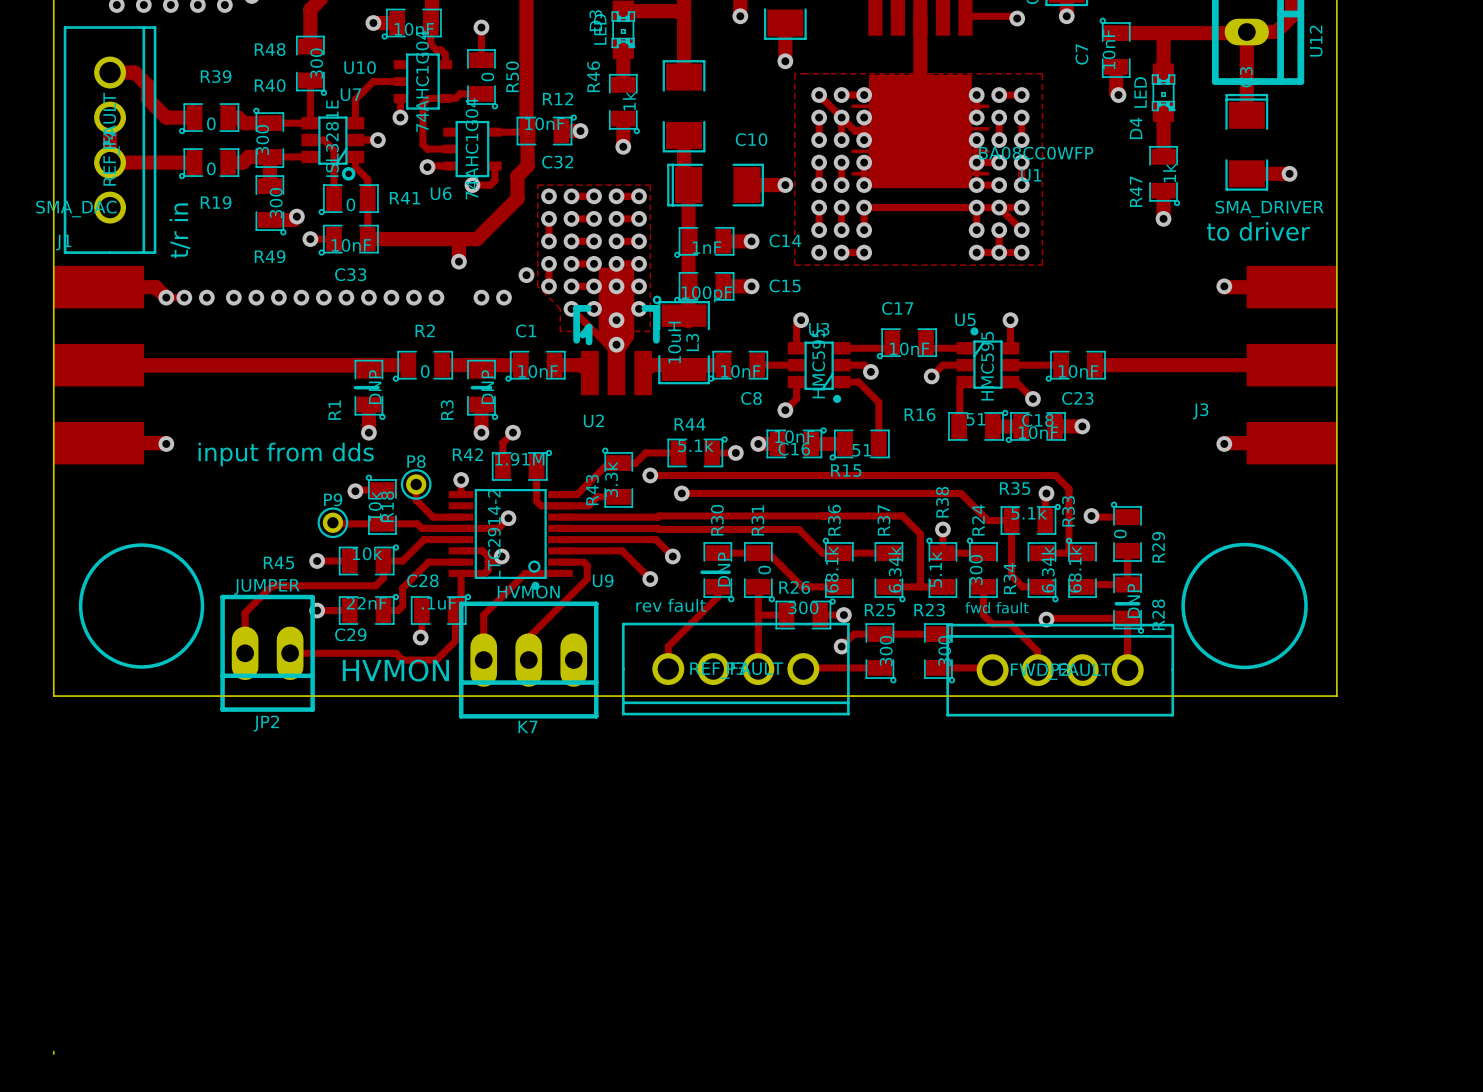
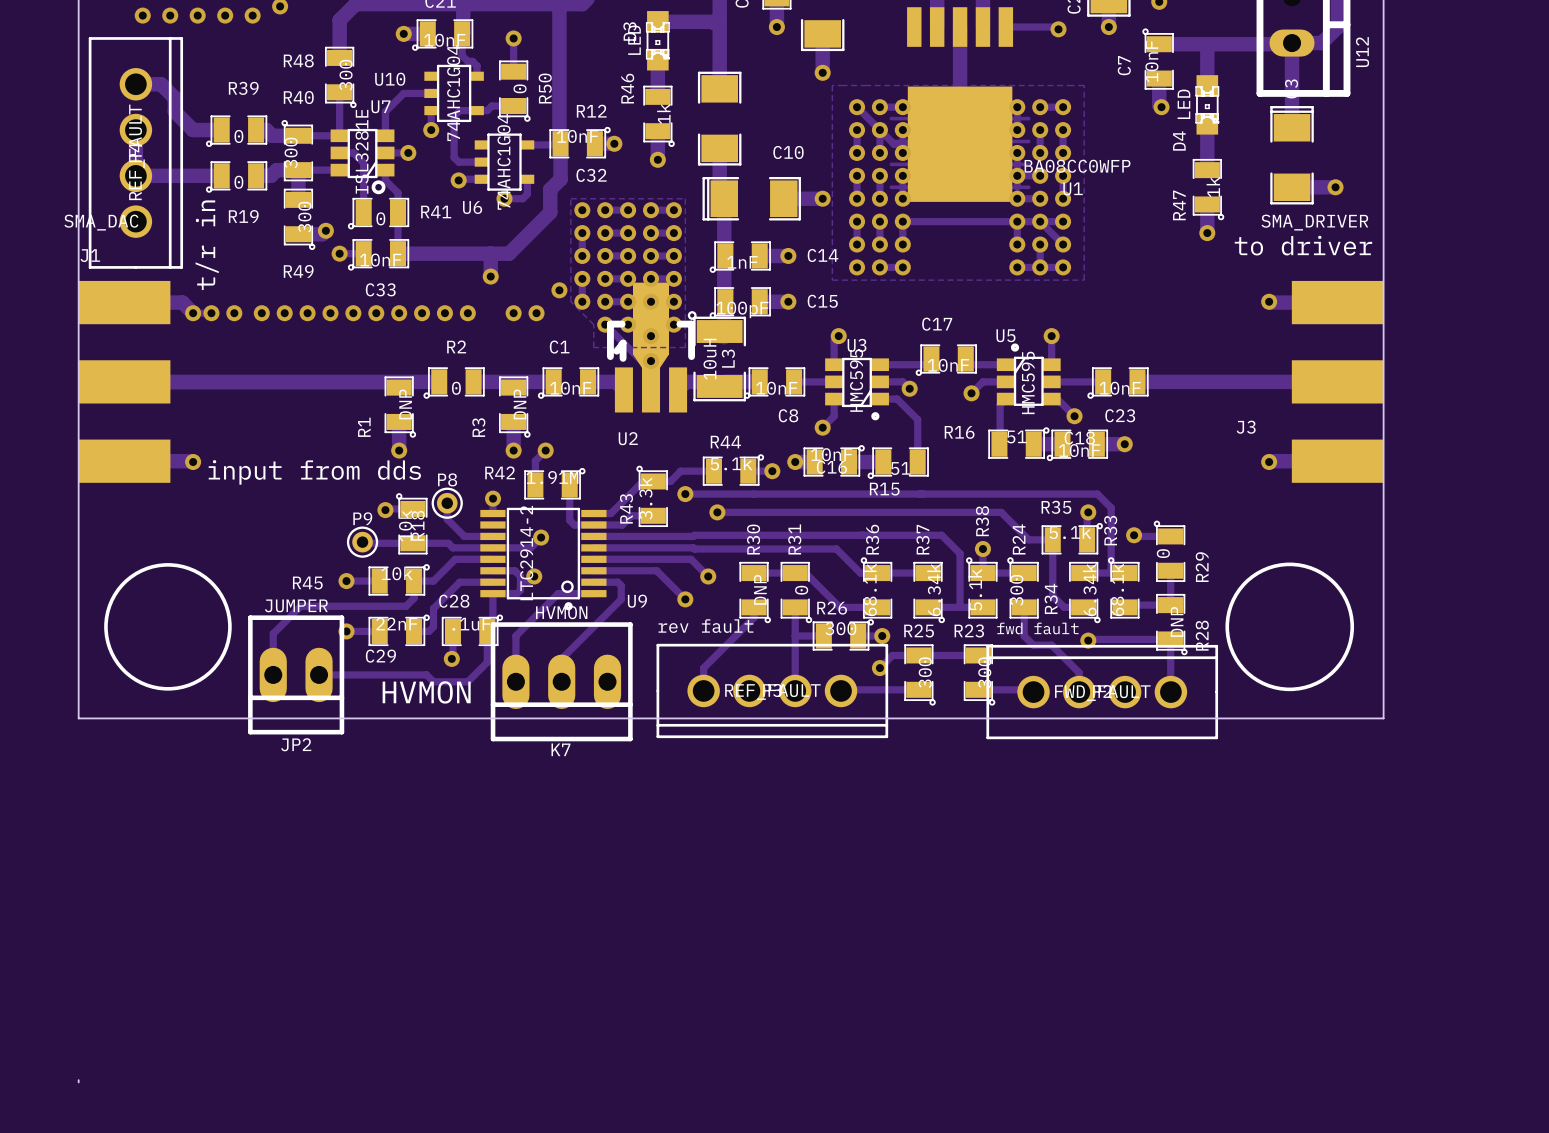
line: (355, 387) (377, 387) -> none
line: (472, 387) (490, 387) -> none
line: (702, 572) (729, 572) -> none
line: (1116, 603) (1138, 603) -> none

